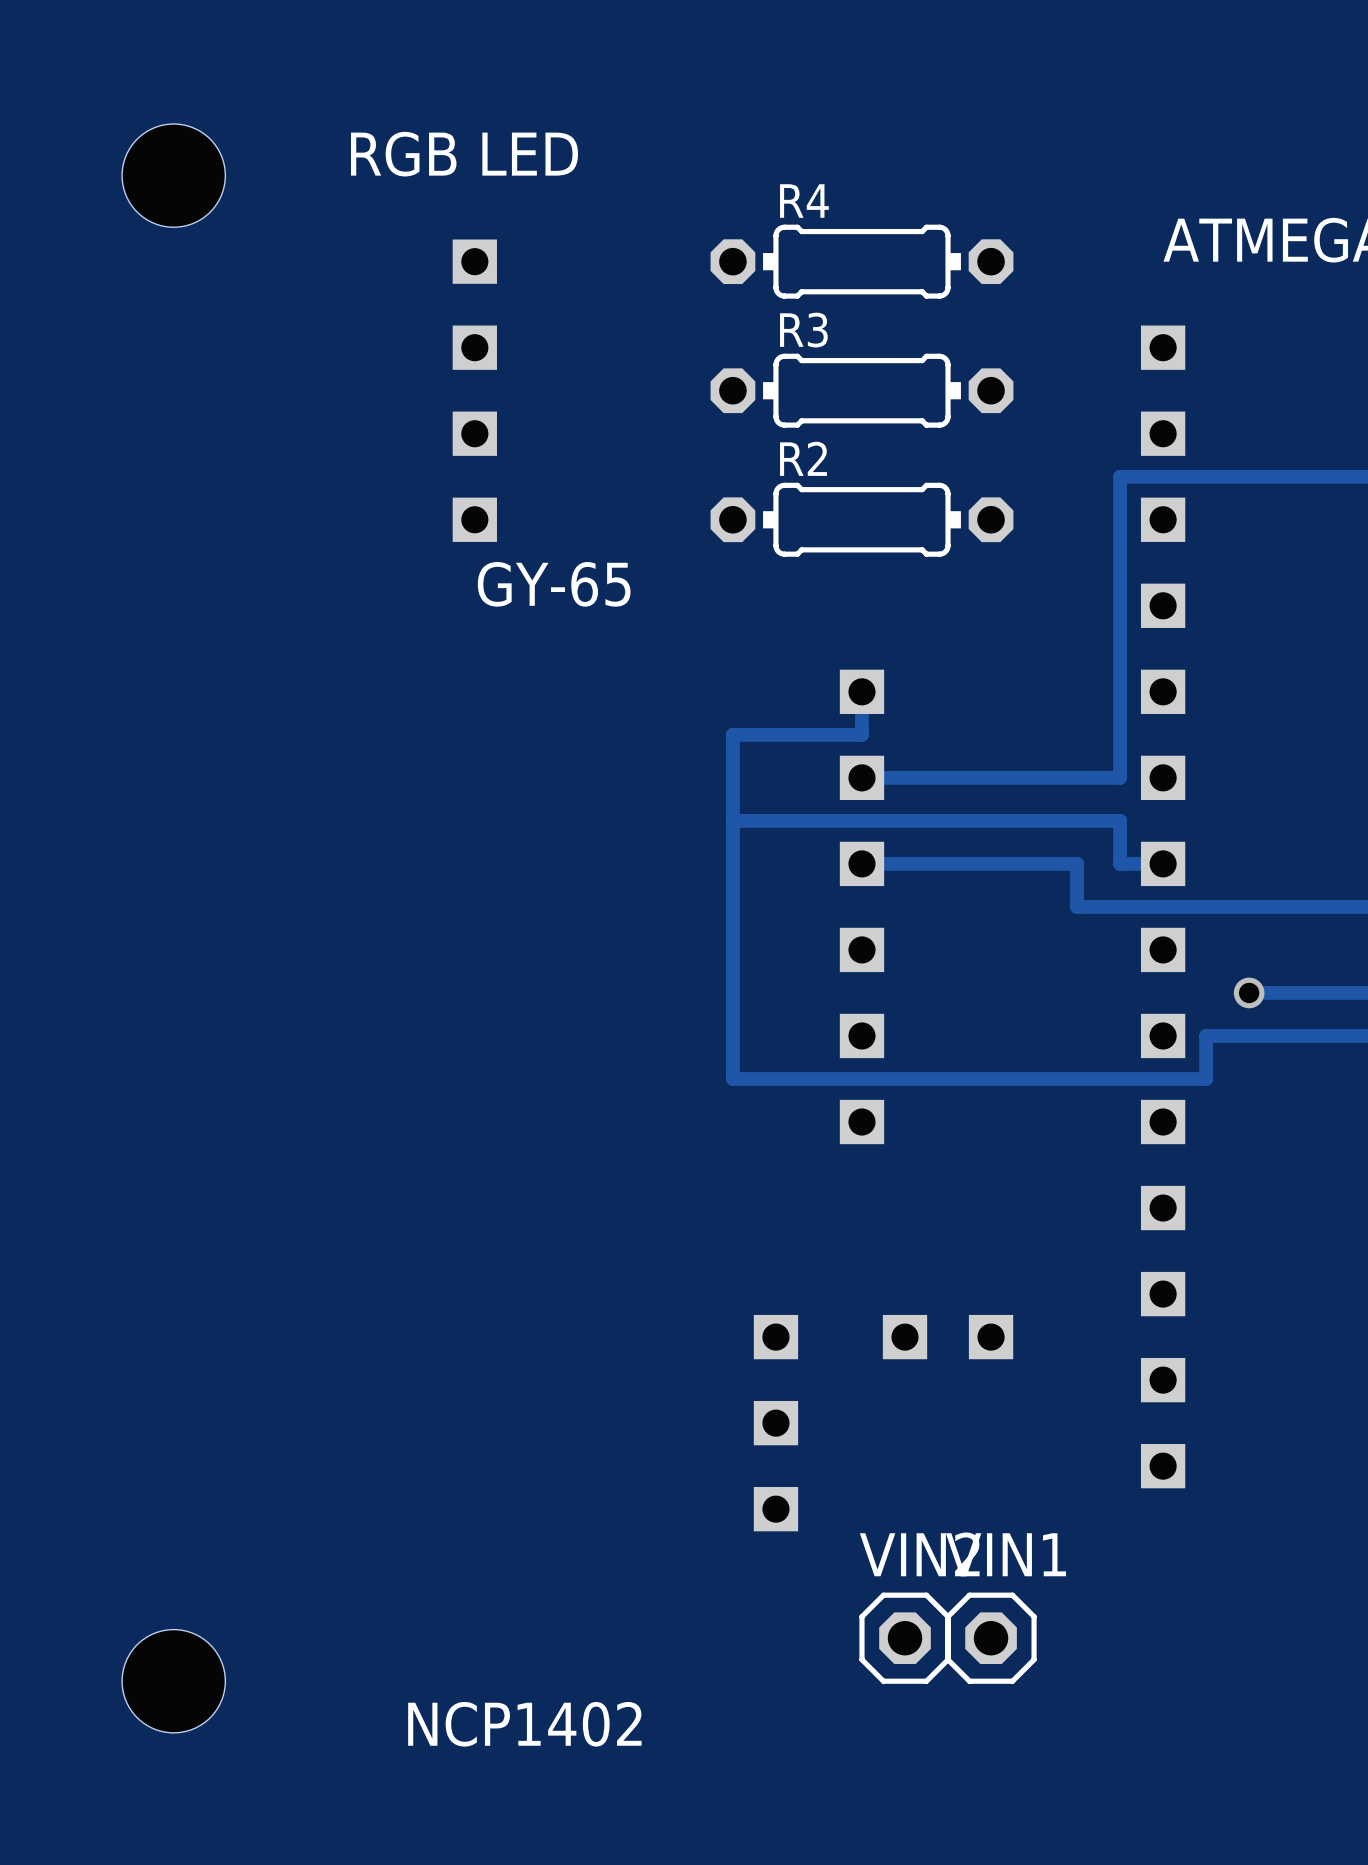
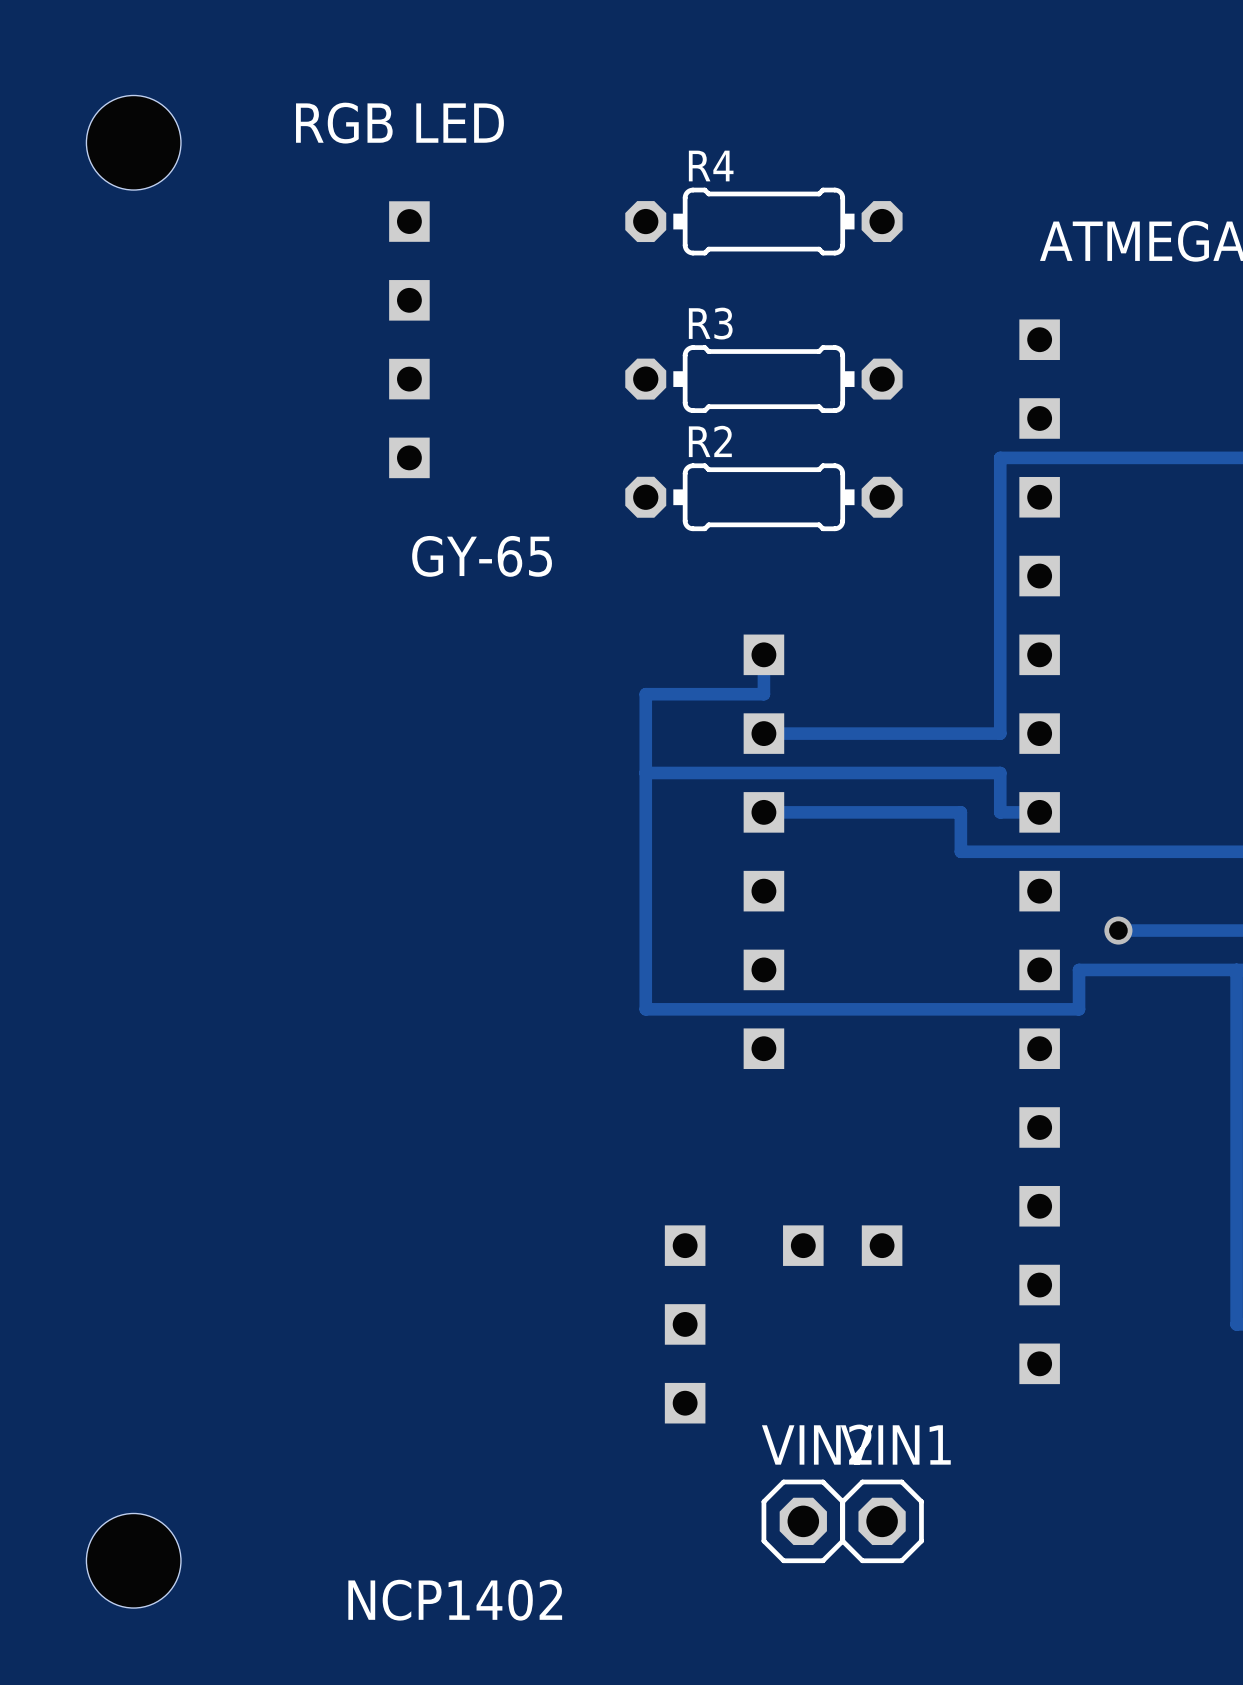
hole position: (173, 175) -> (133, 142)
R4 position: (861, 261) -> (763, 221)
part position: (474, 390) -> (409, 339)

